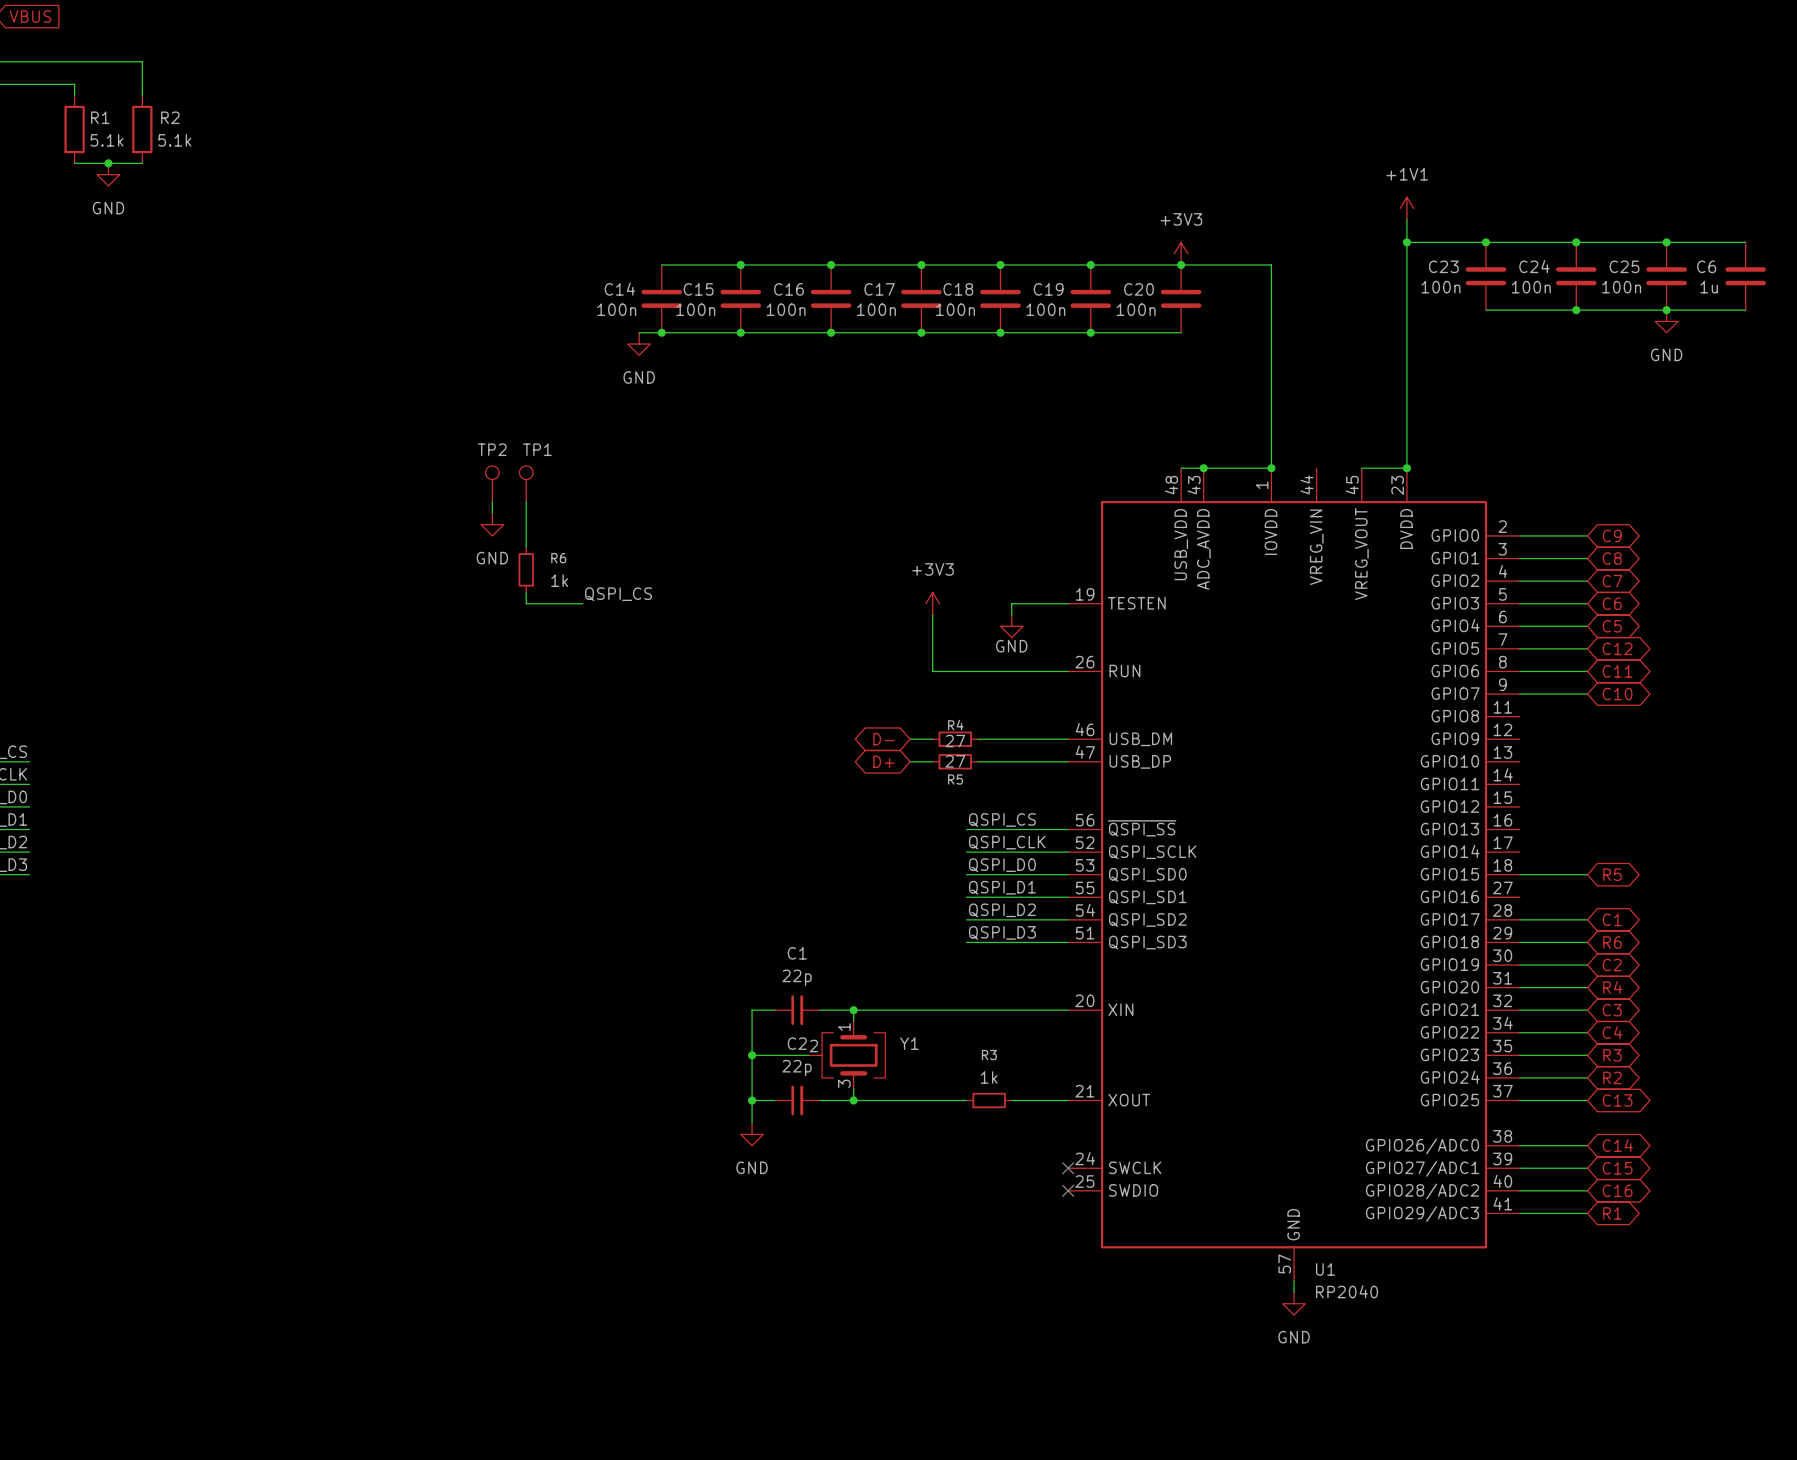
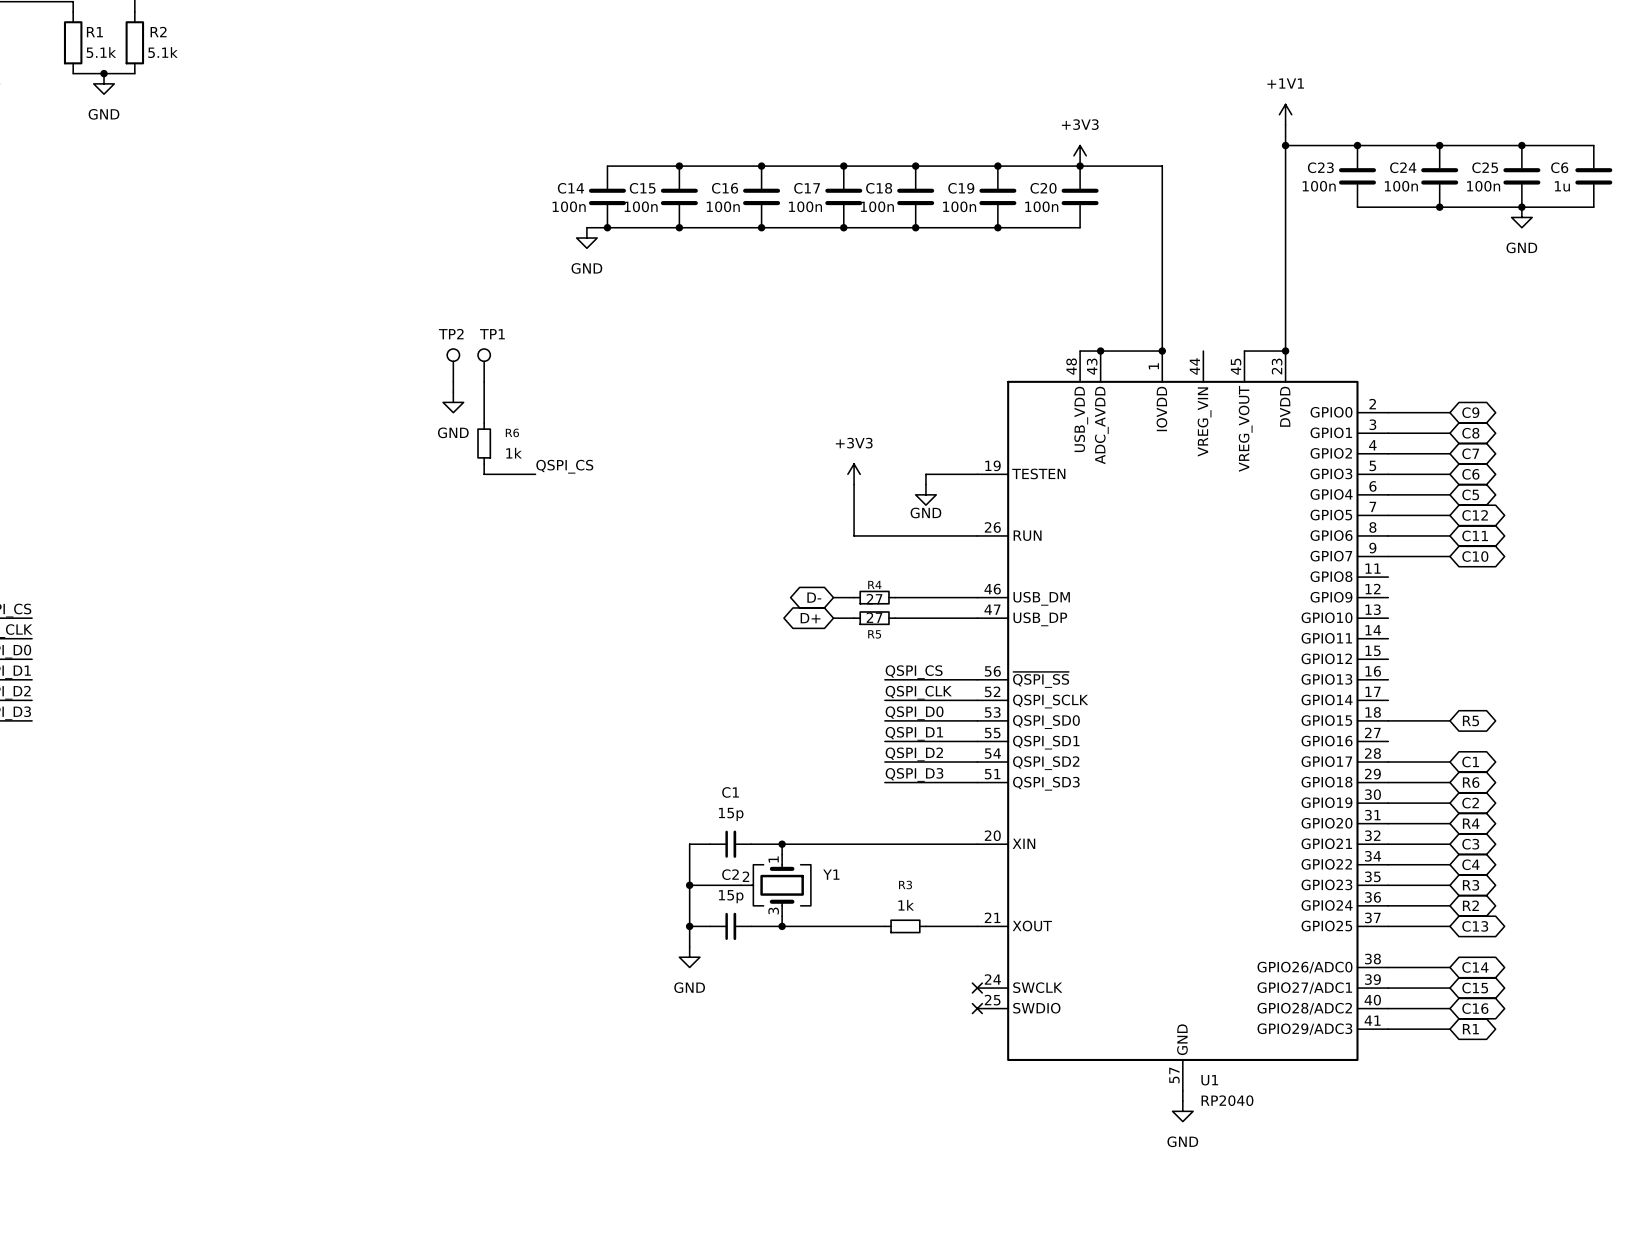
C1 value: 22p (797, 977) -> 15p (731, 814)
C2 value: 22p (797, 1068) -> 15p (731, 896)

